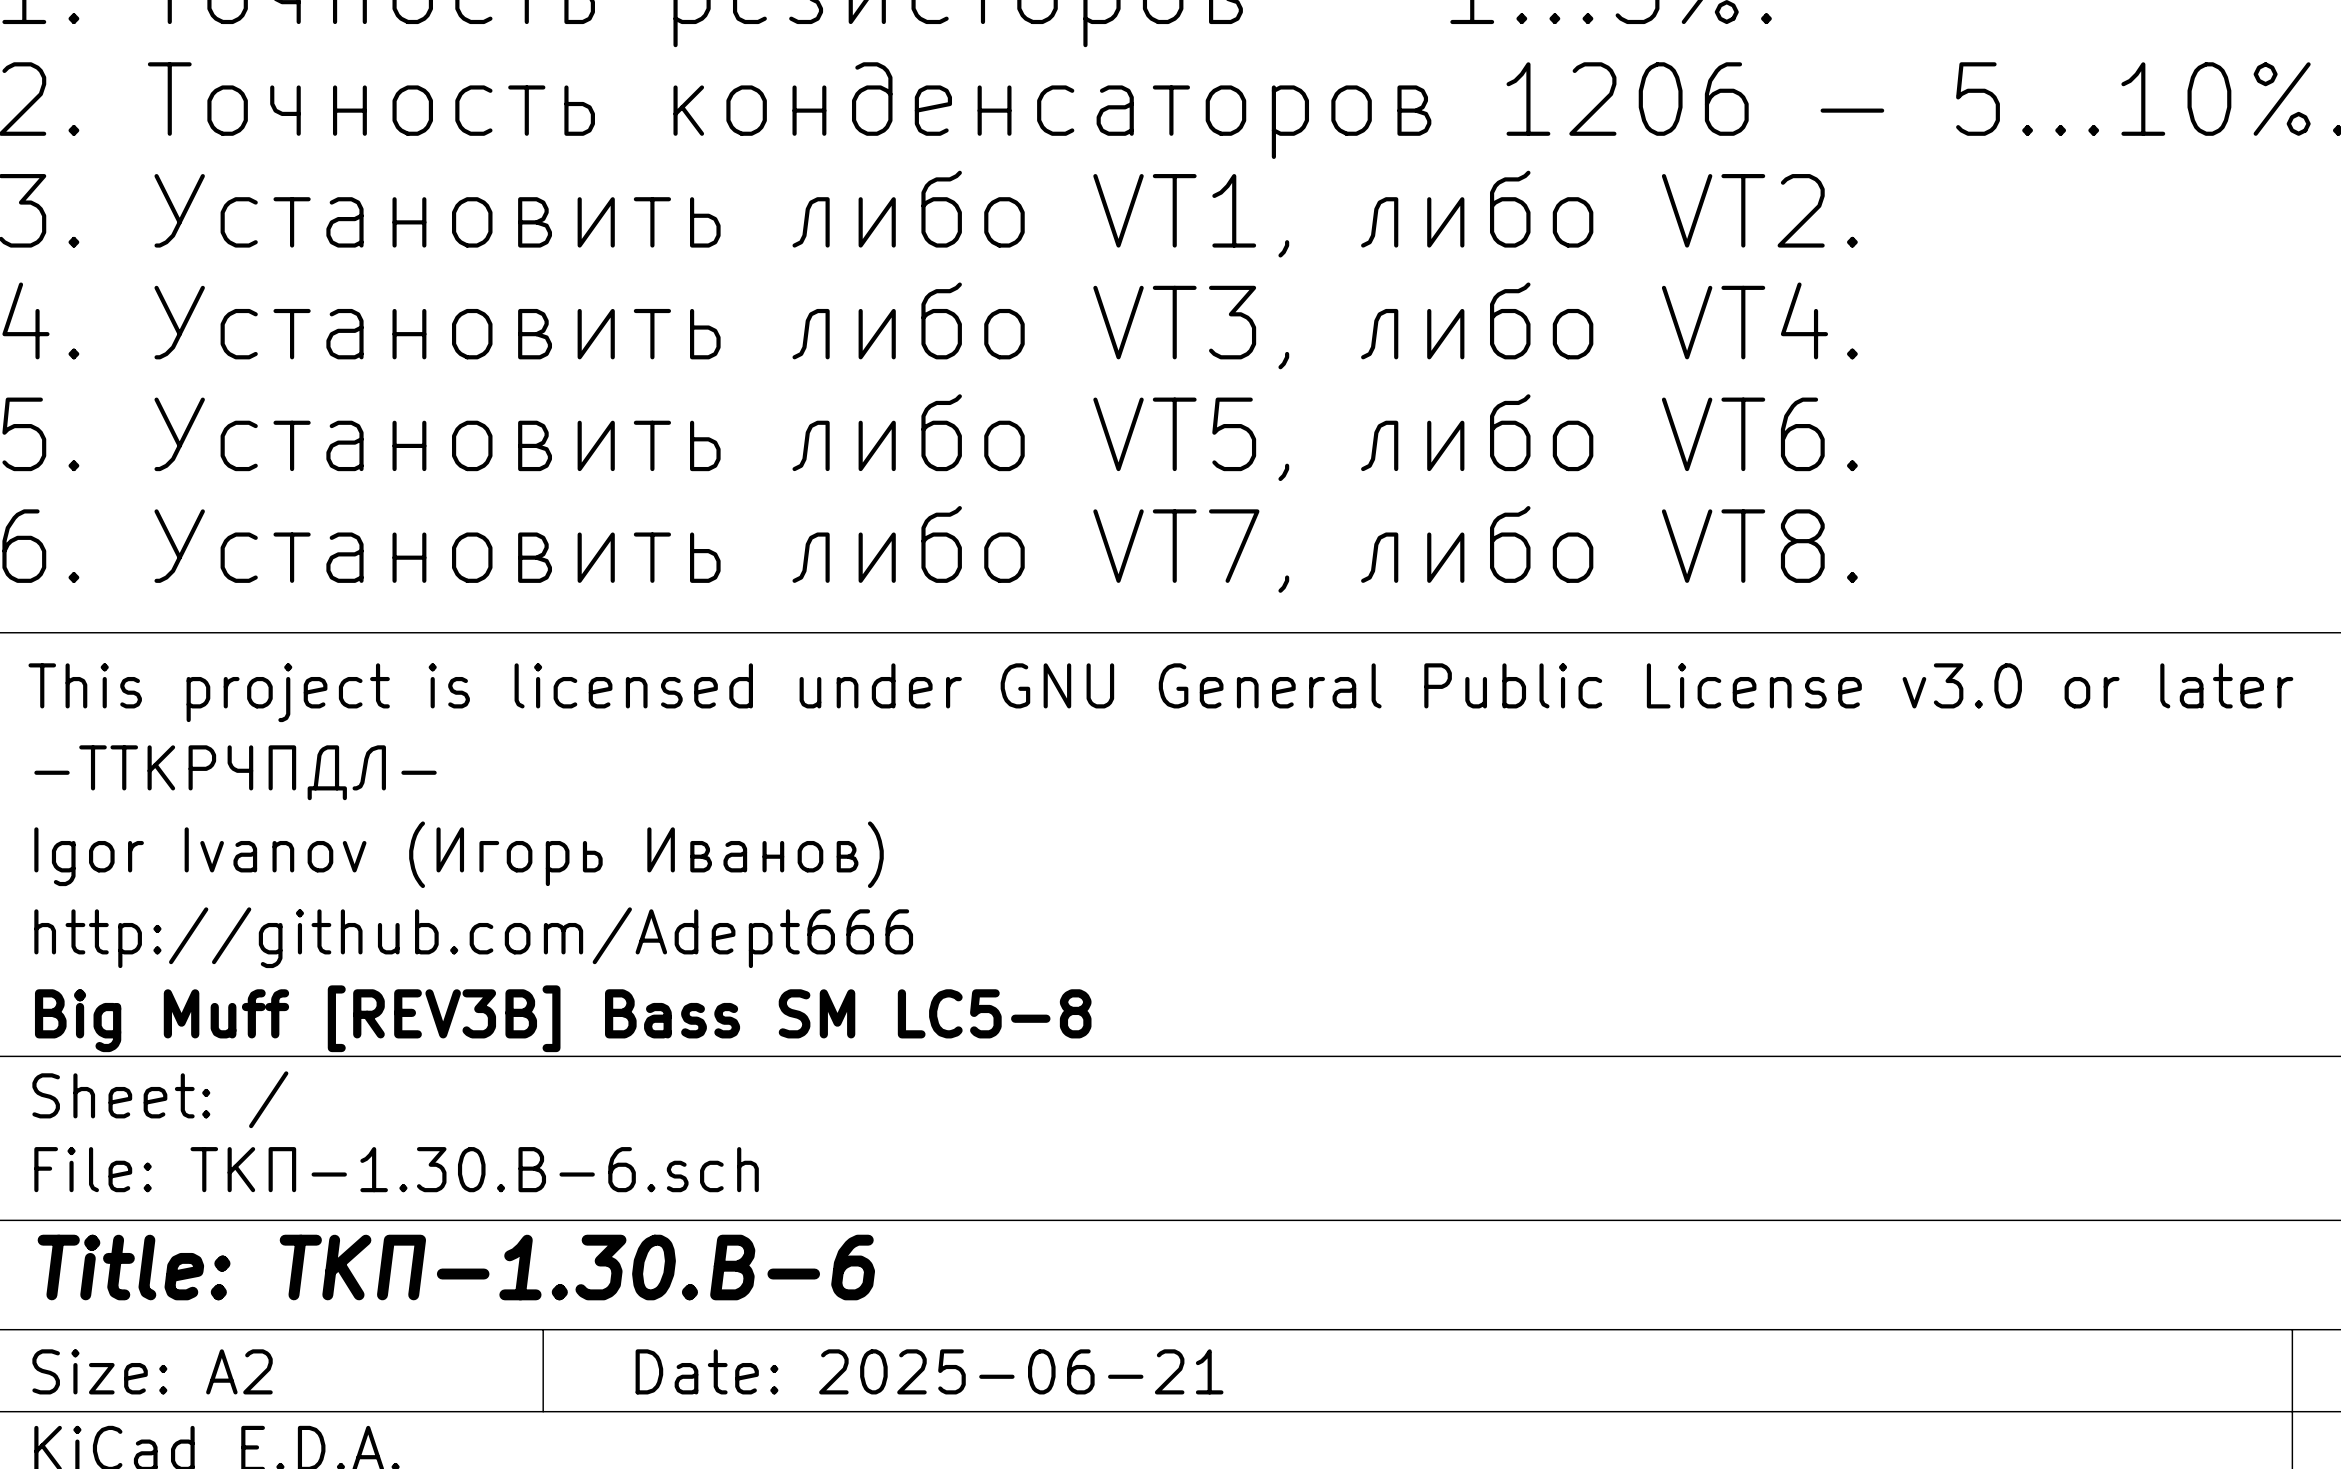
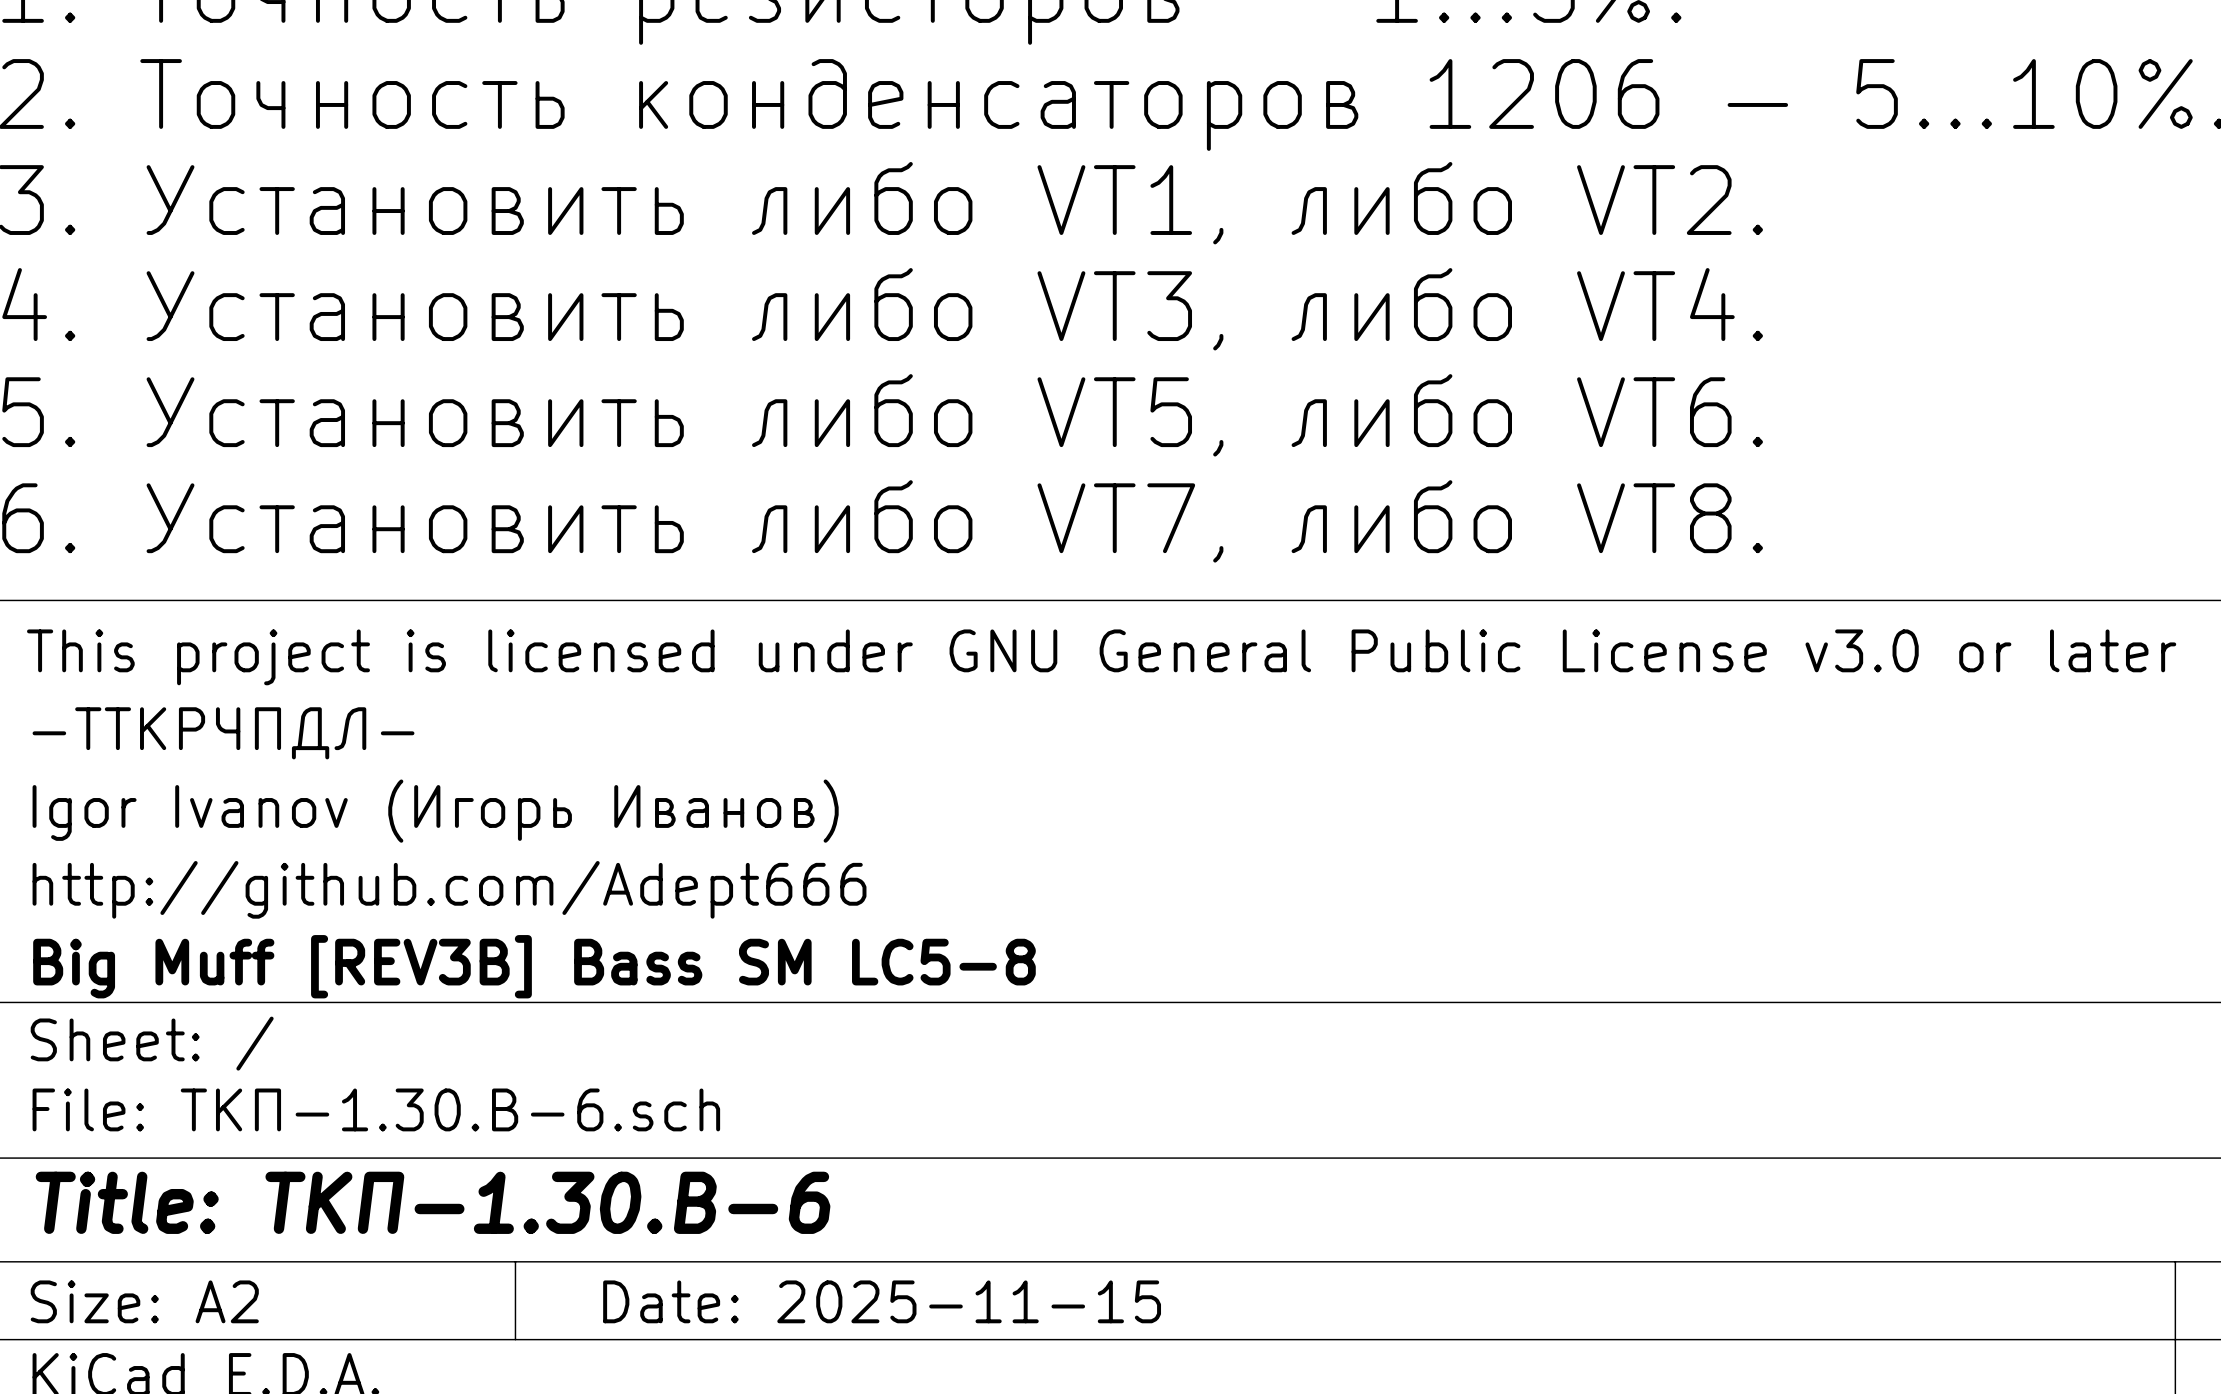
title block: Date: 2025-06-21 (929, 1371) -> Date: 2025-11-15 (882, 1301)

